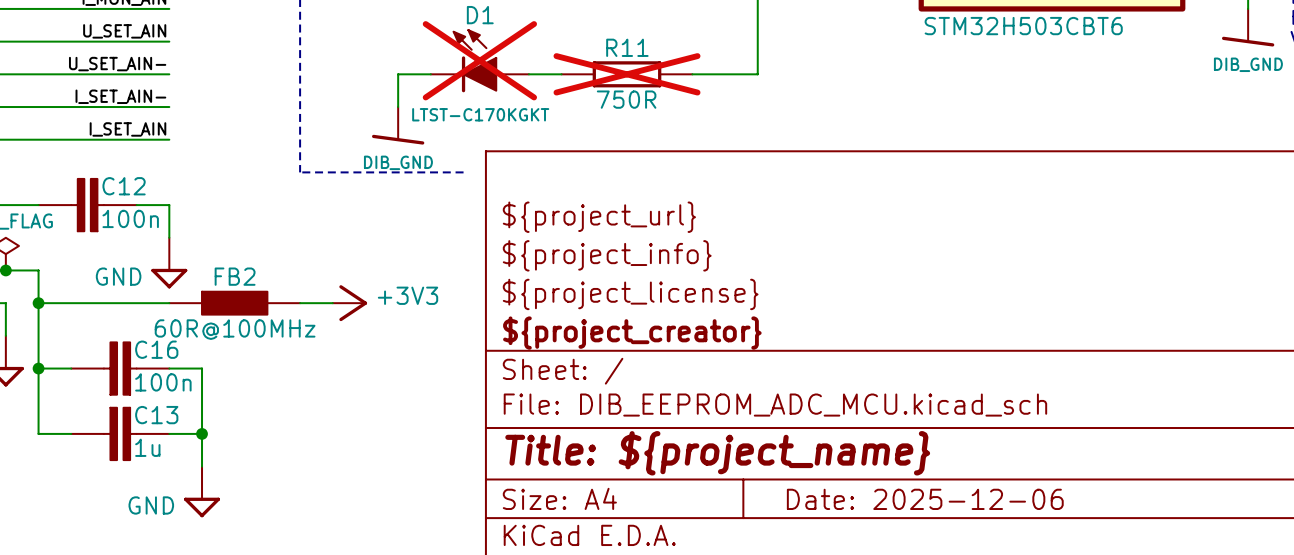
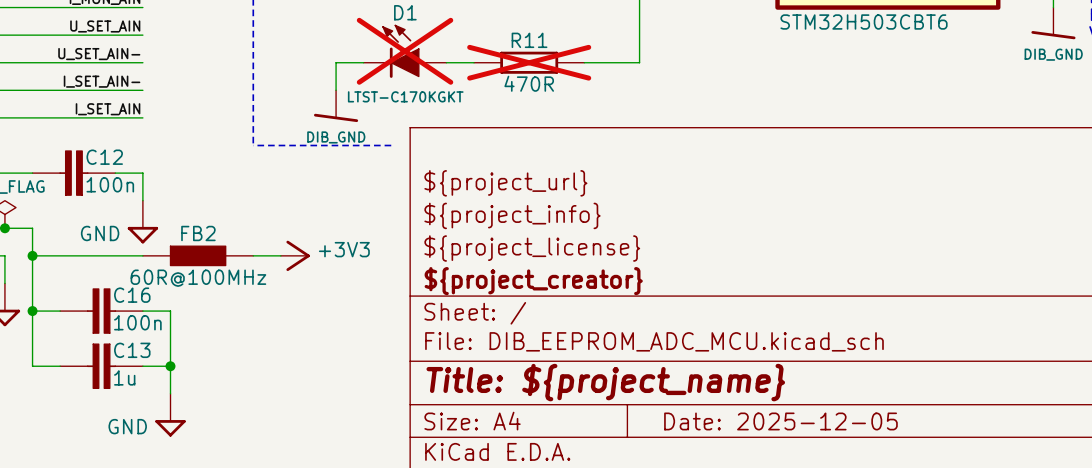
R11 value: 750R (626, 99) -> 470R (529, 83)
title block: Date: 2025-12-06 (925, 499) -> Date: 2025-12-05 (780, 421)

